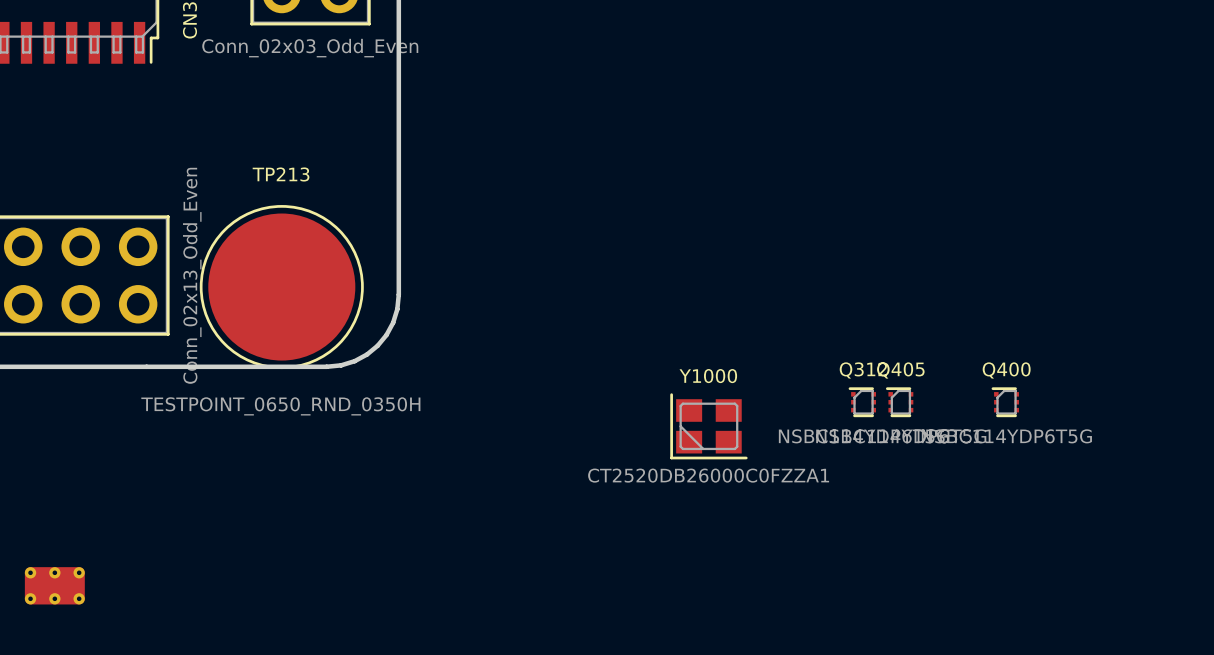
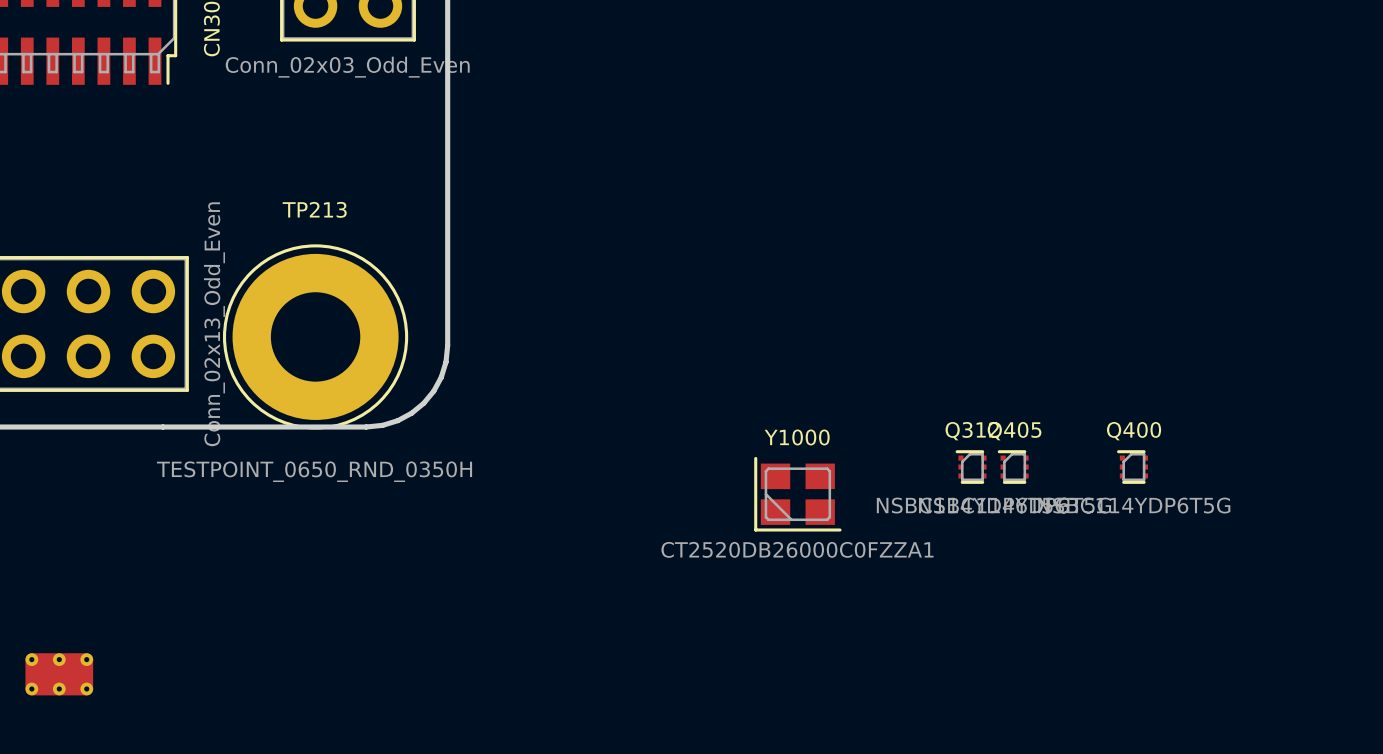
TP213 footprint: [199, 205, 364, 370] -> [222, 244, 409, 430]

